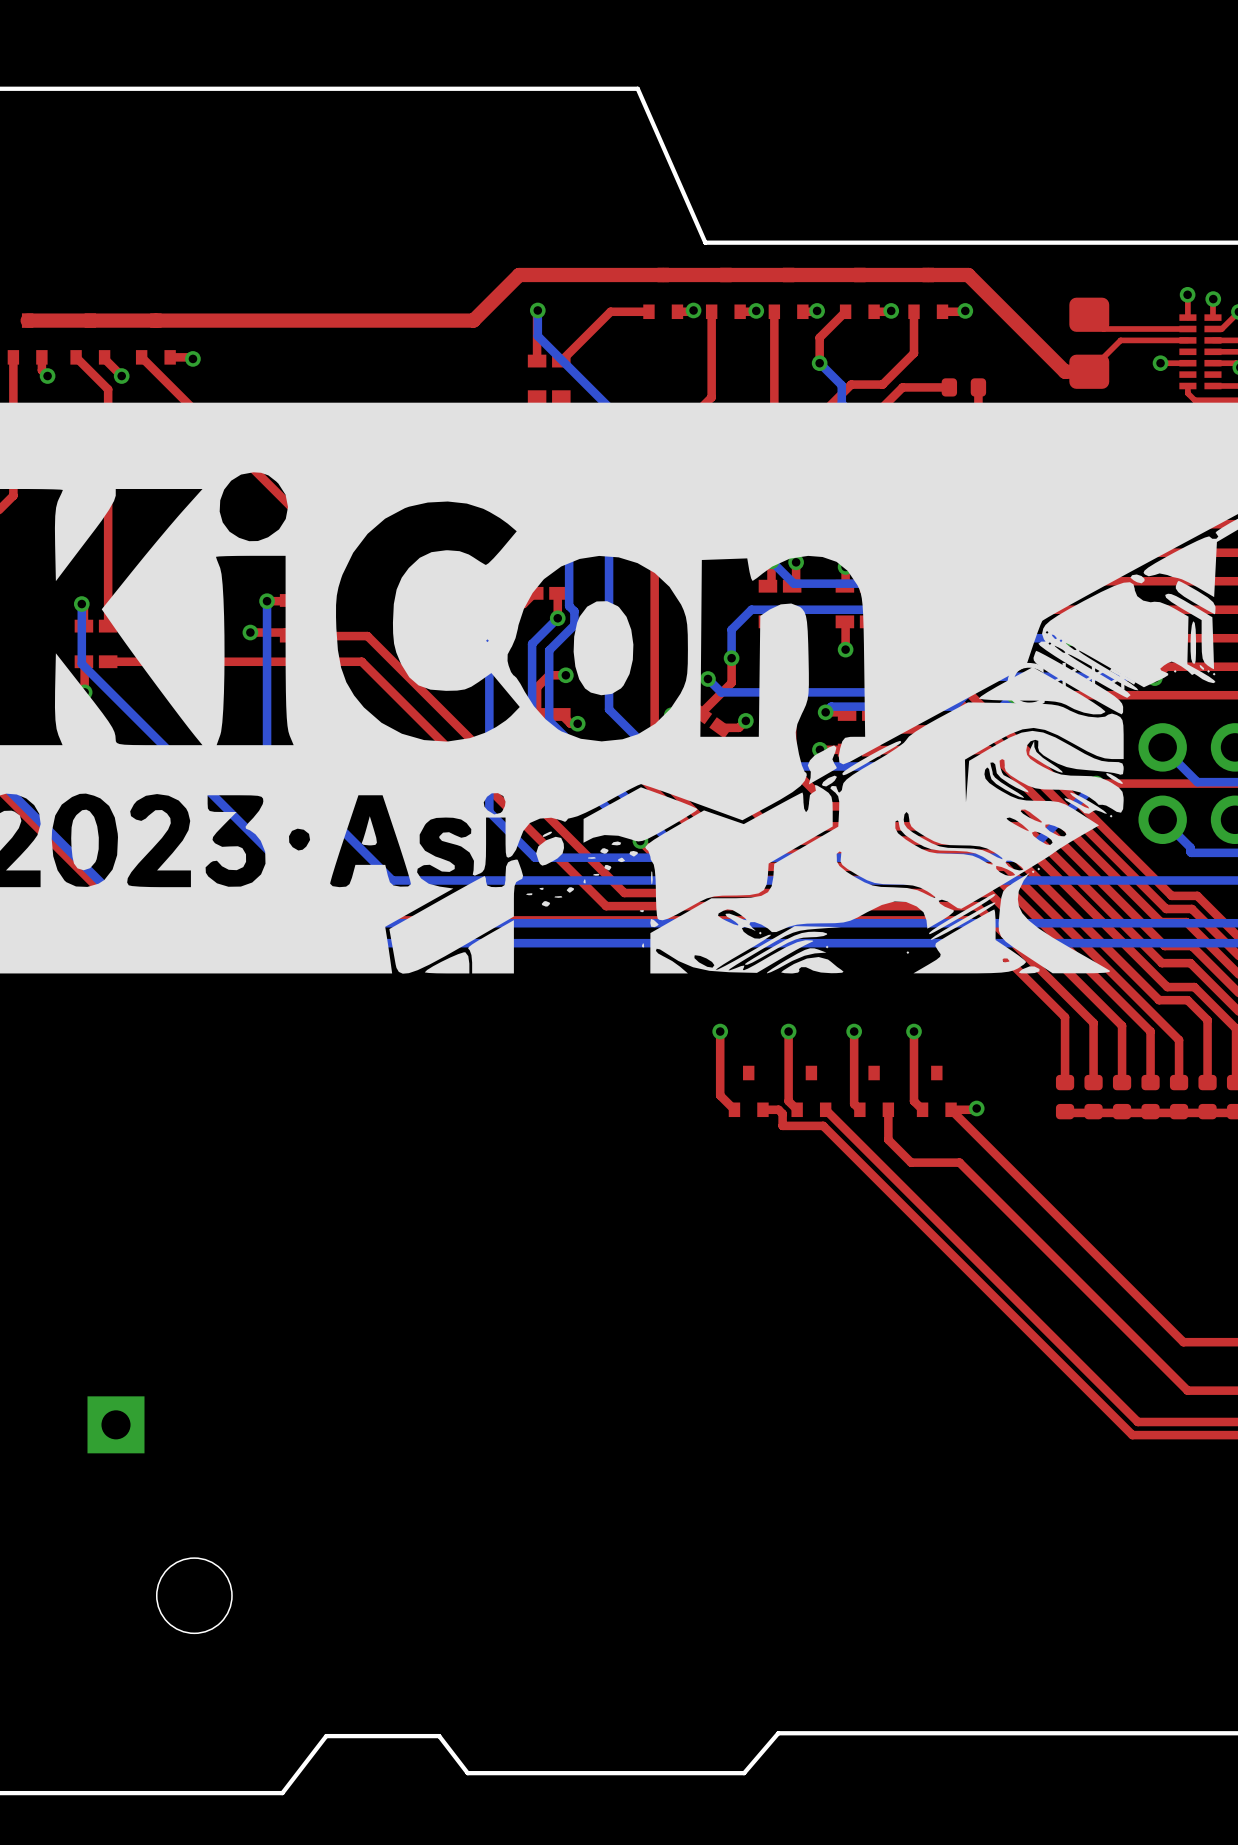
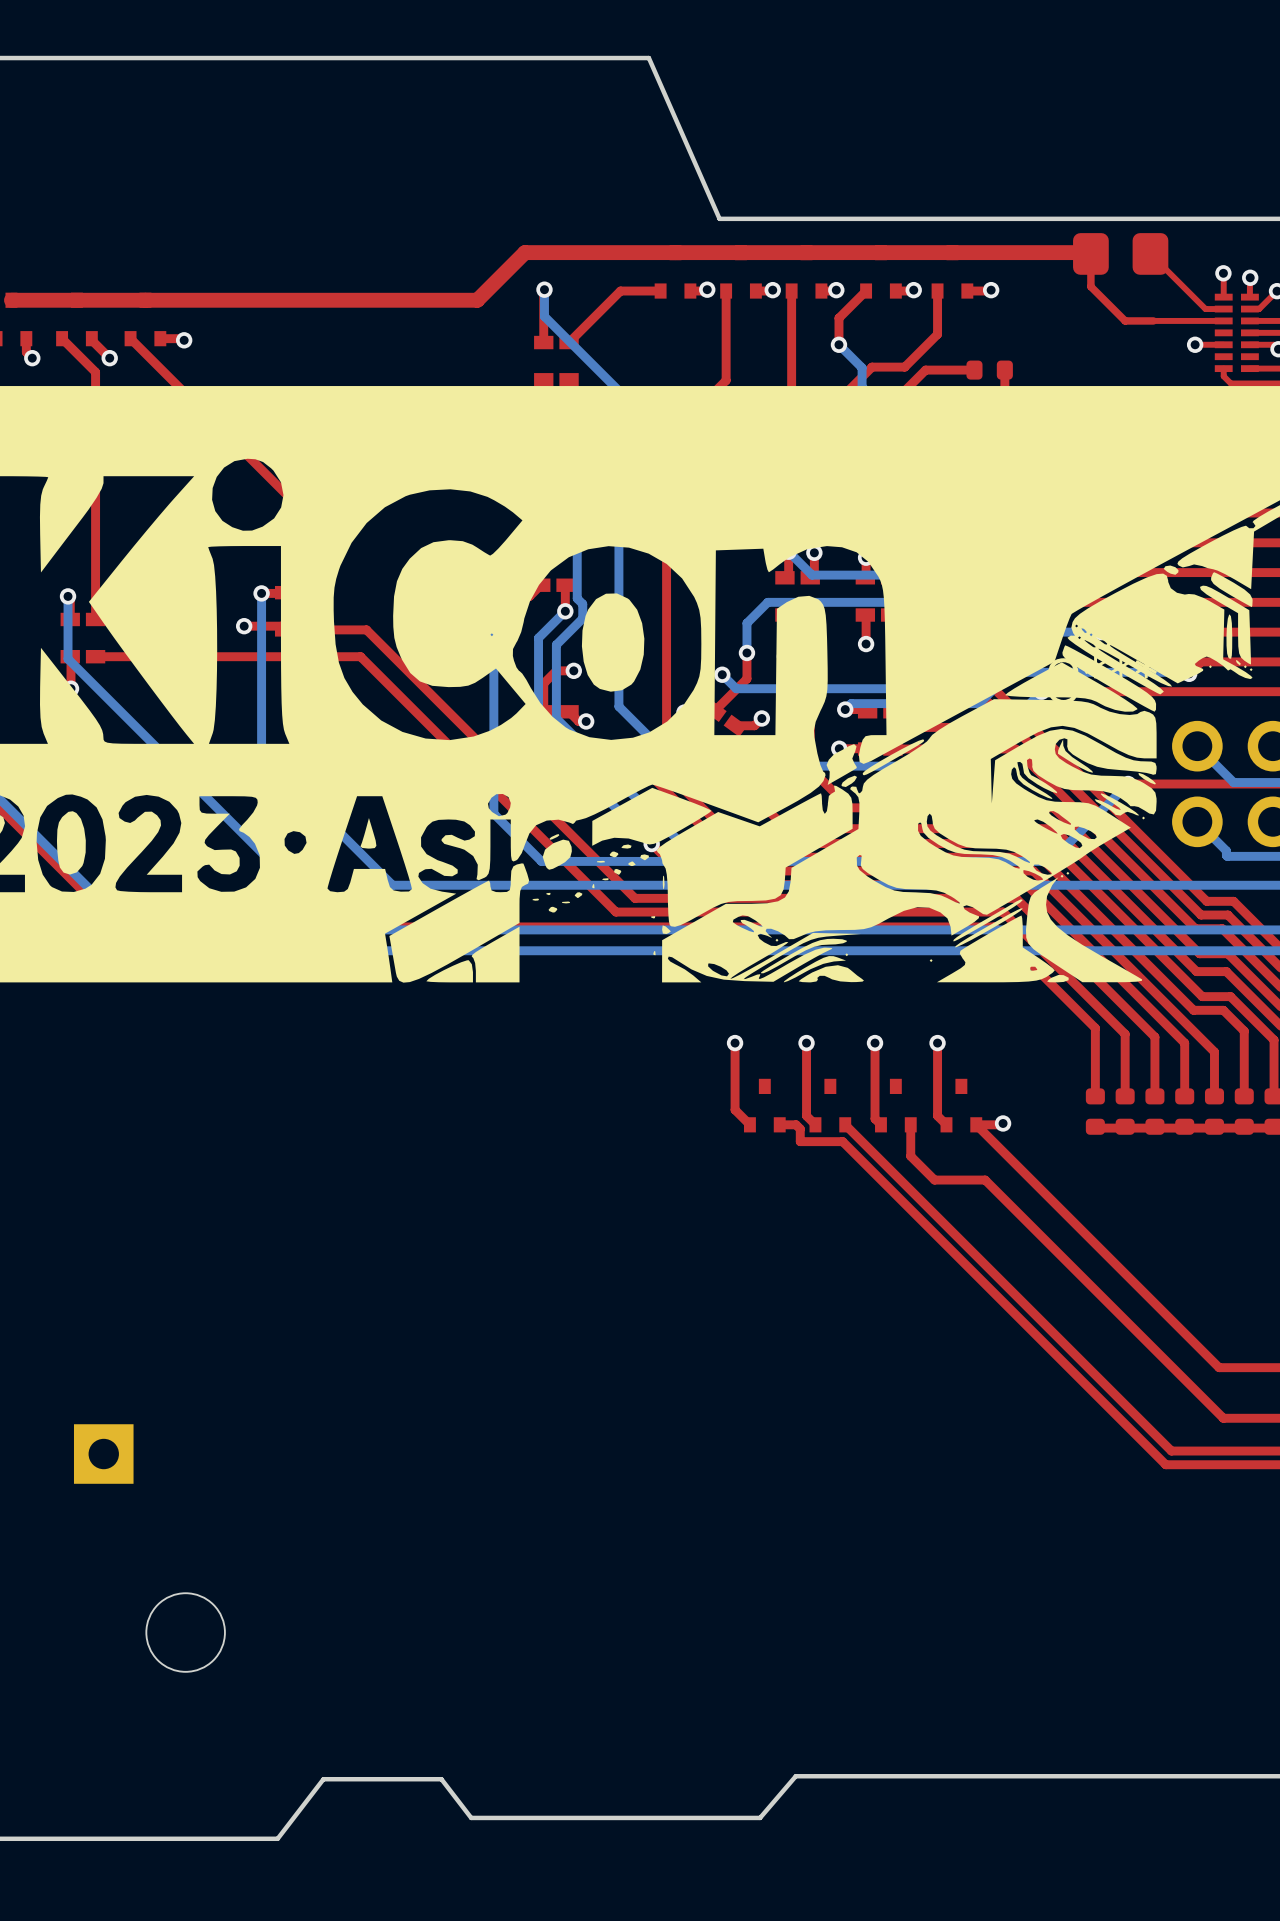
top track: (968, 274) (1065, 371) (1089, 371) (1120, 340) -> (994, 252) (1089, 252) (1090, 286) (1125, 320) (1153, 320)
top track: (1089, 314) (1103, 329) (1170, 329) -> (1150, 253) (1205, 309)
part rotation: 0° (1089, 343) -> 90° clockwise (1120, 253)
part position: (1089, 343) -> (1120, 253)

